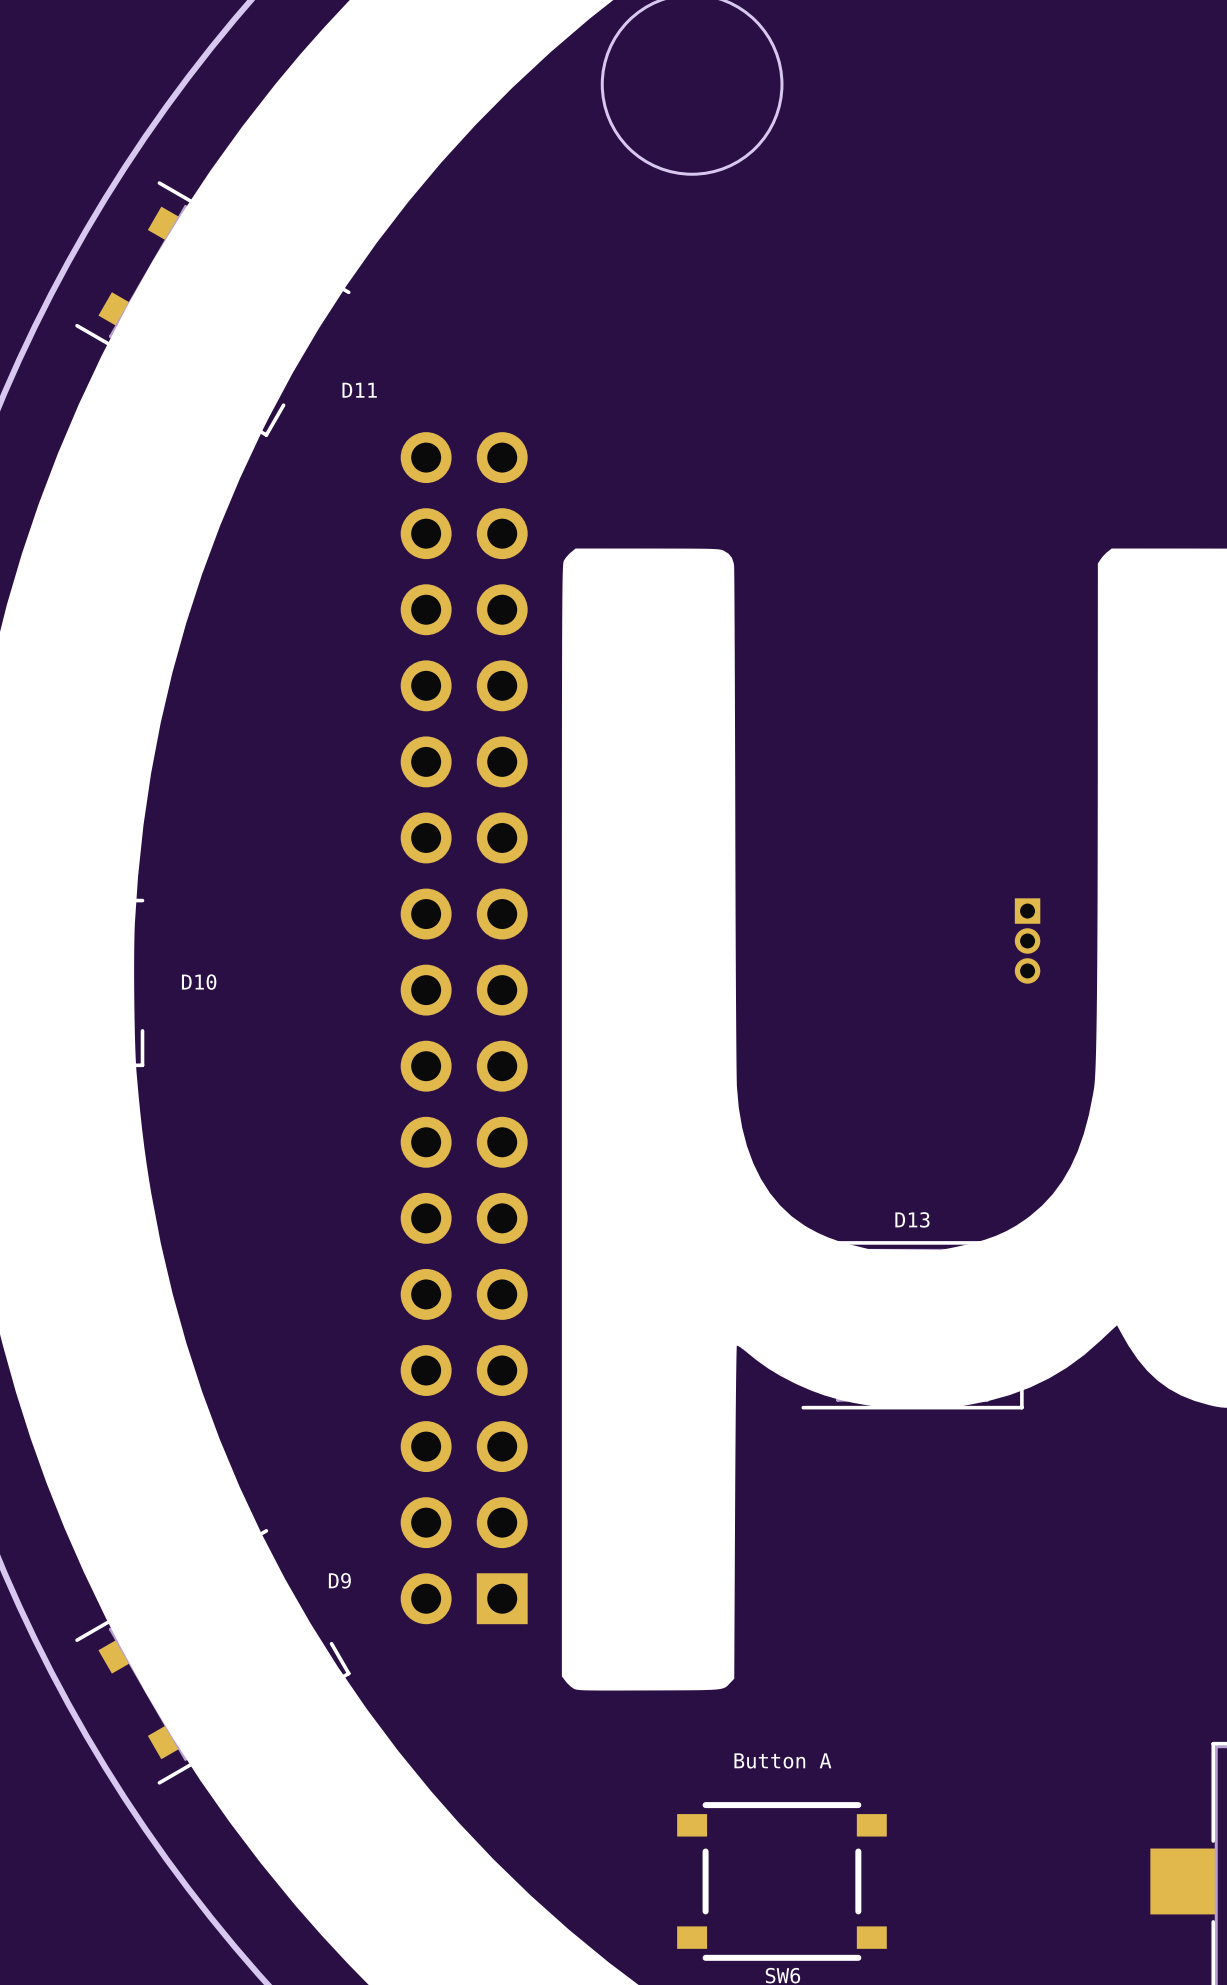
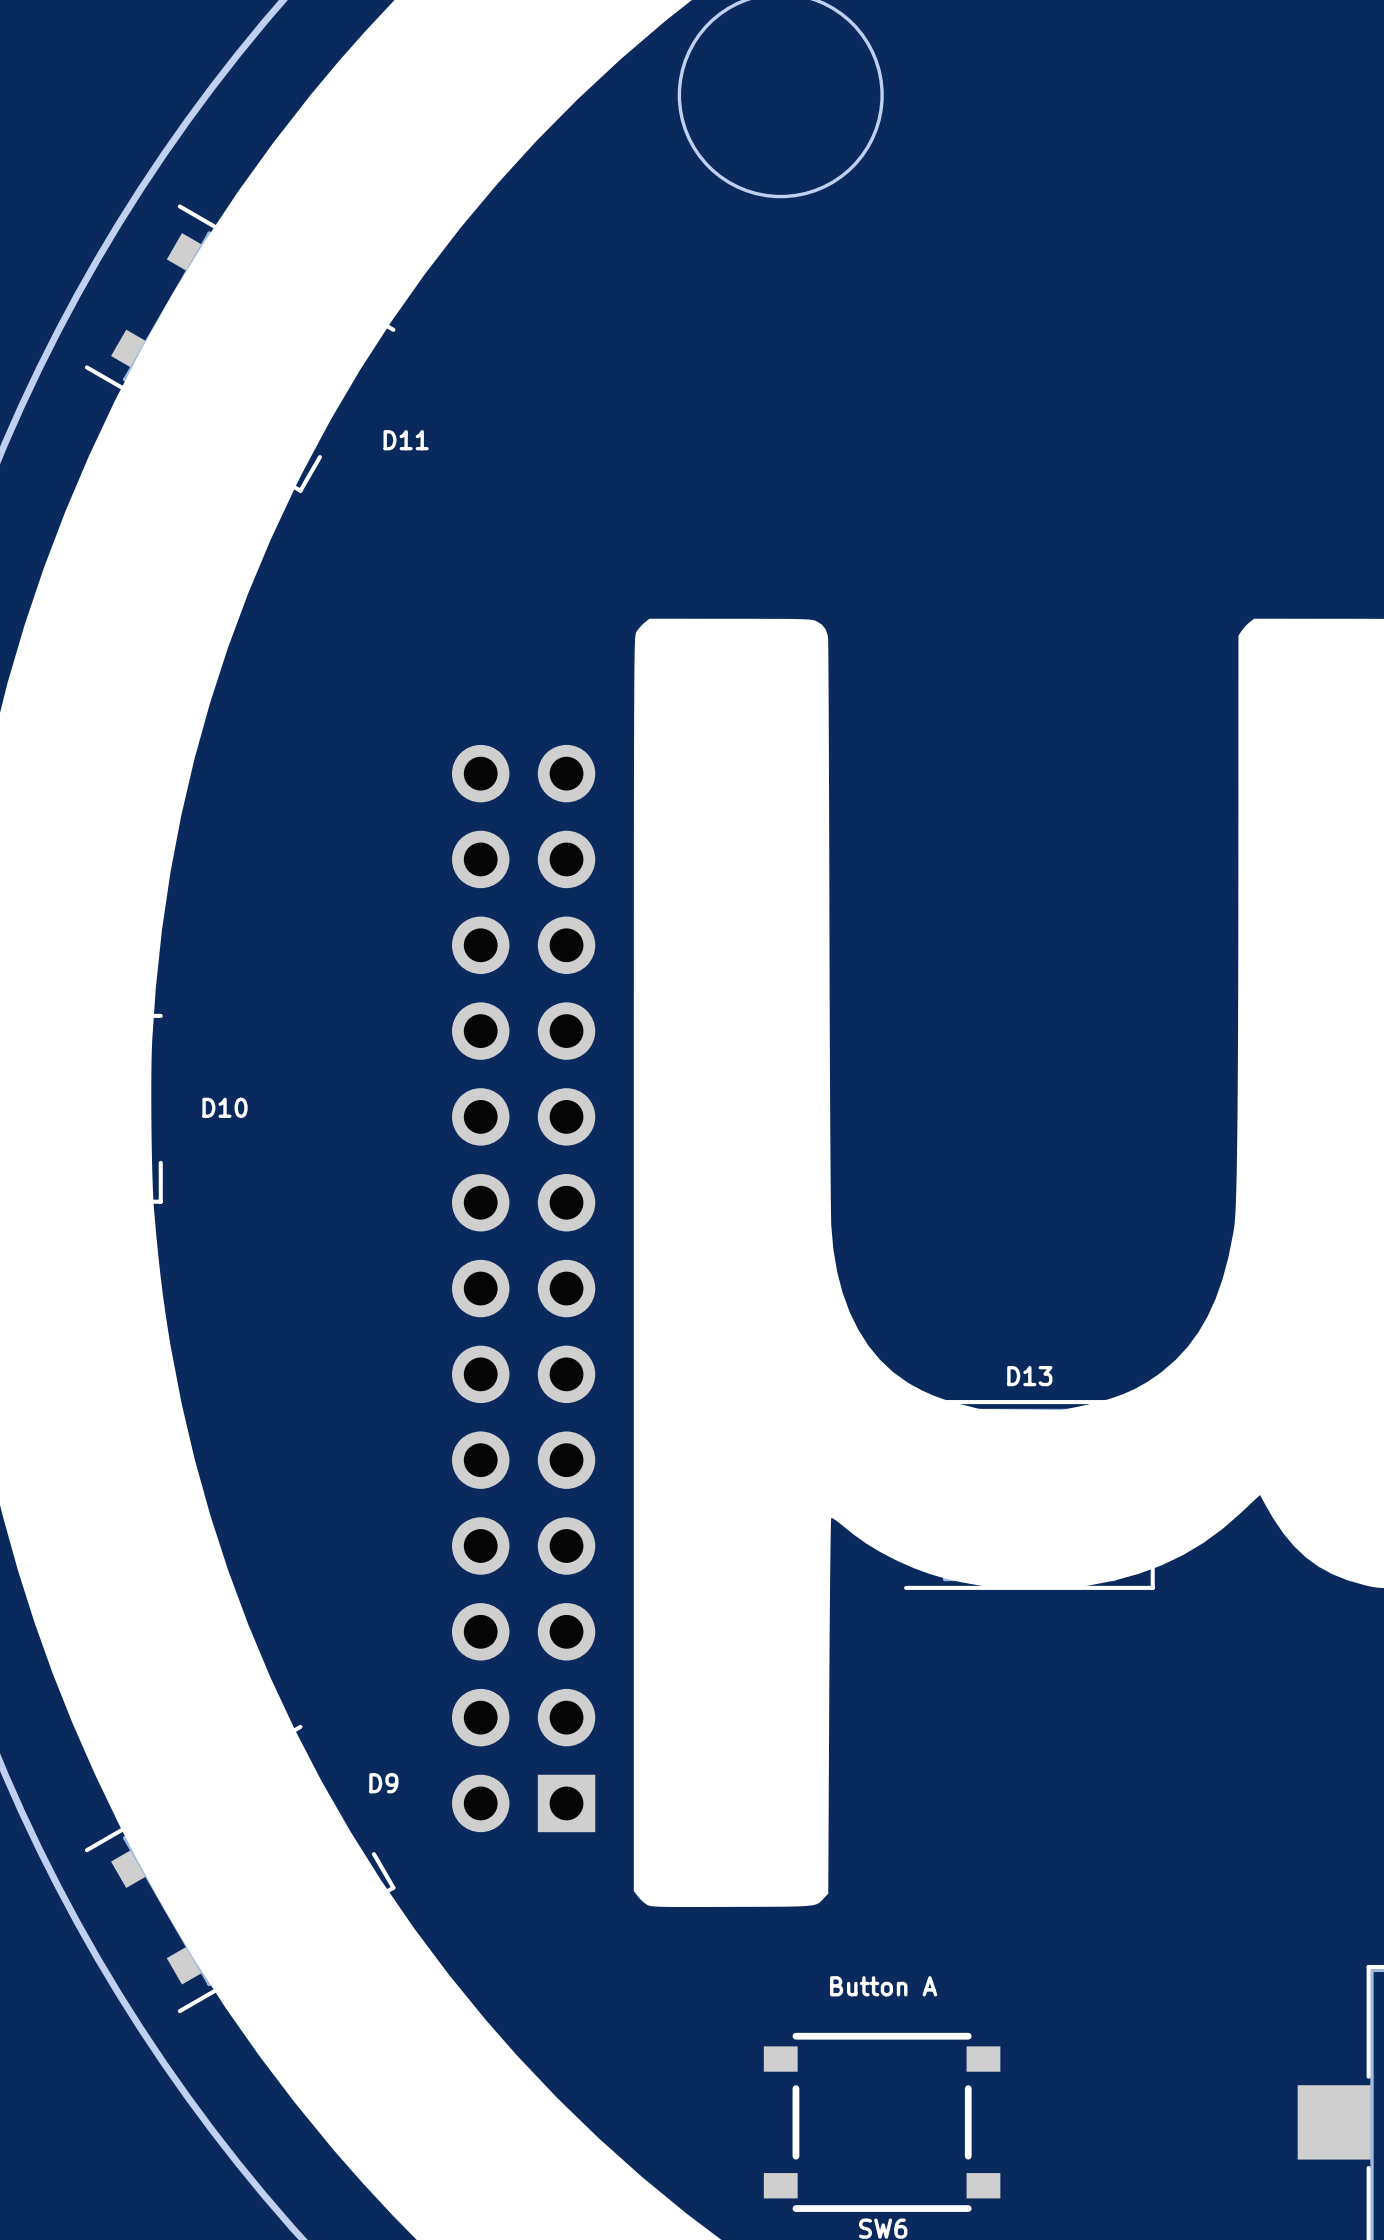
part: (1027, 941) -> none
part: (464, 1028) -> none

